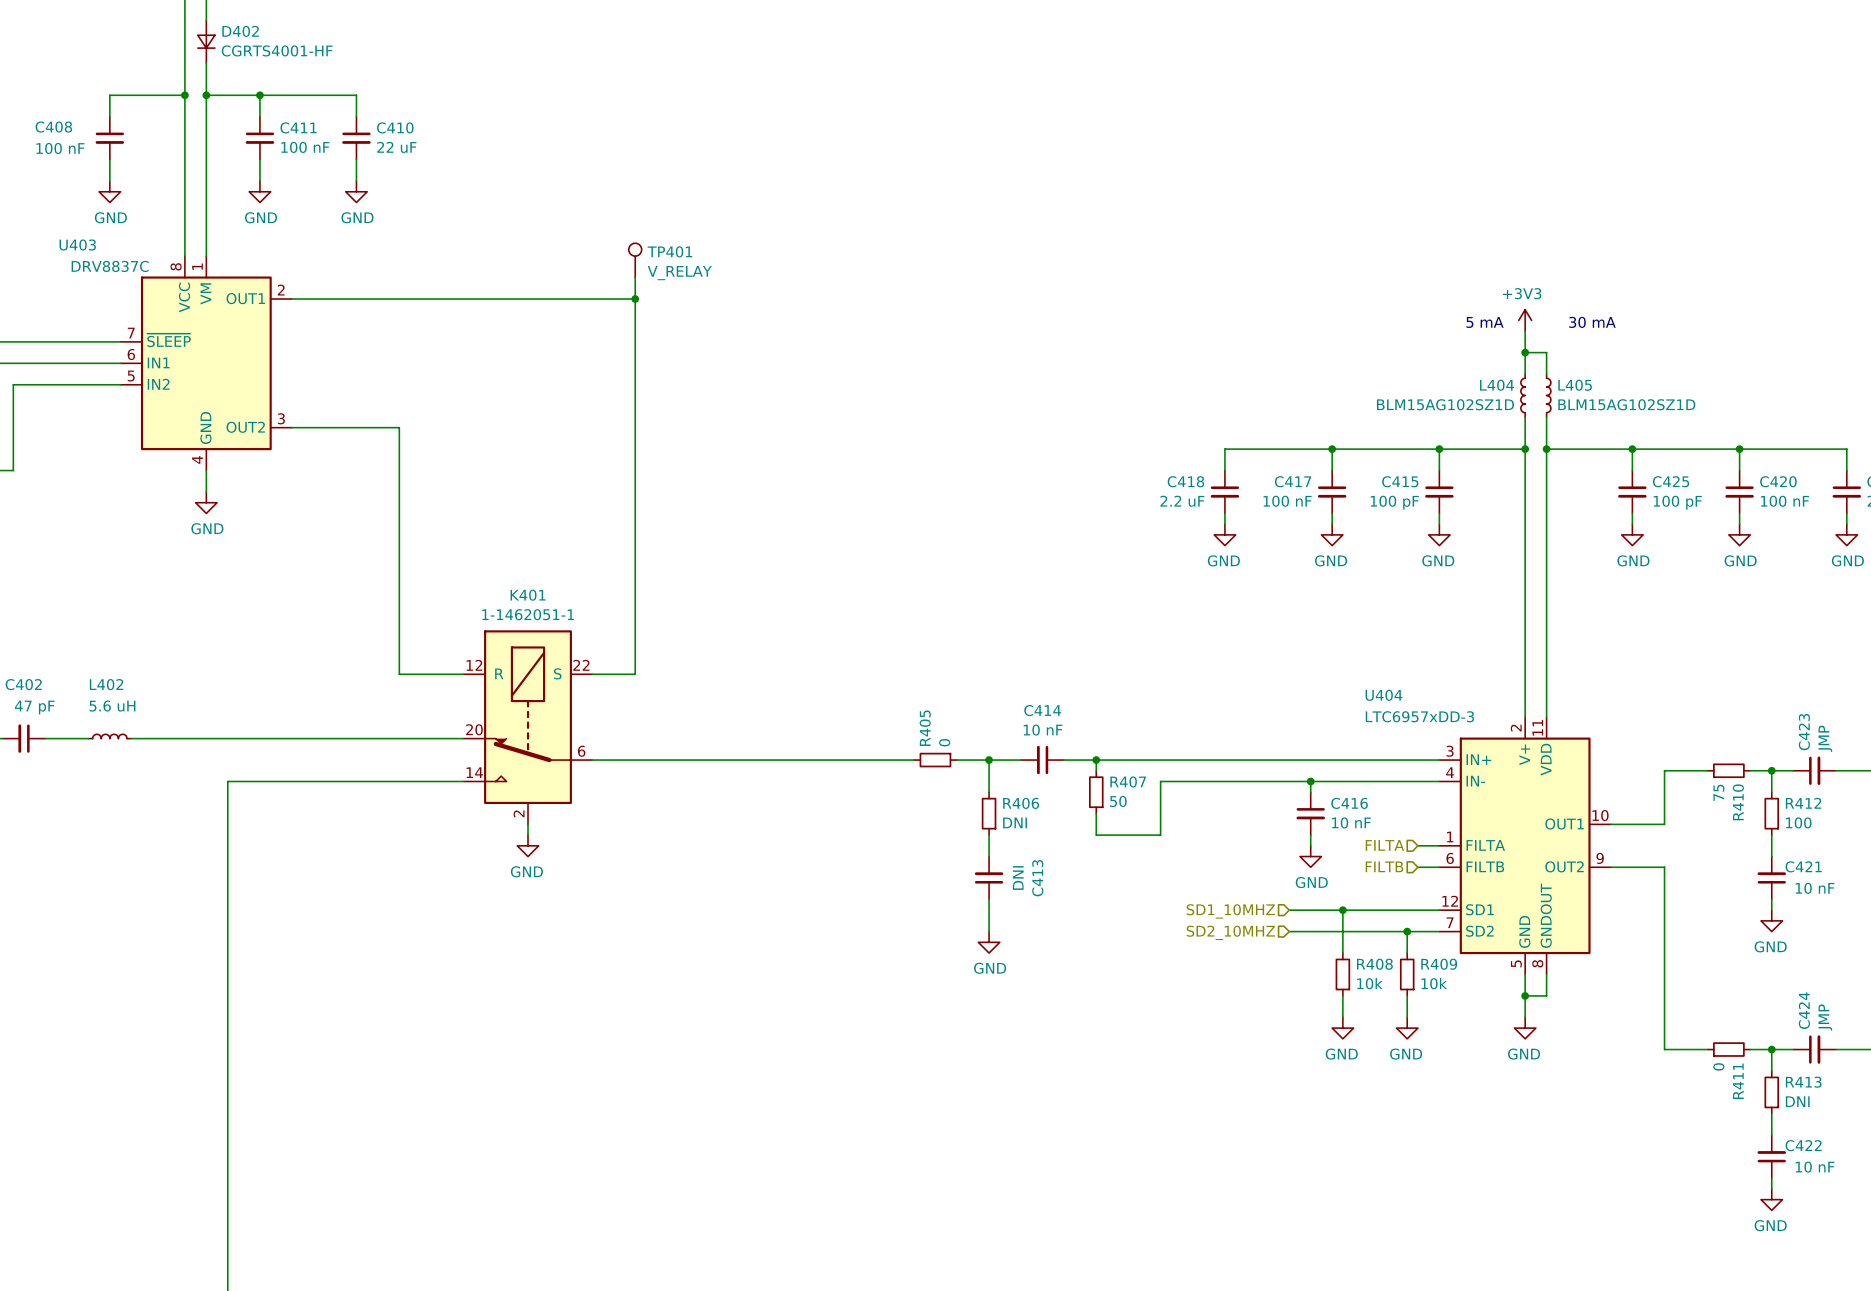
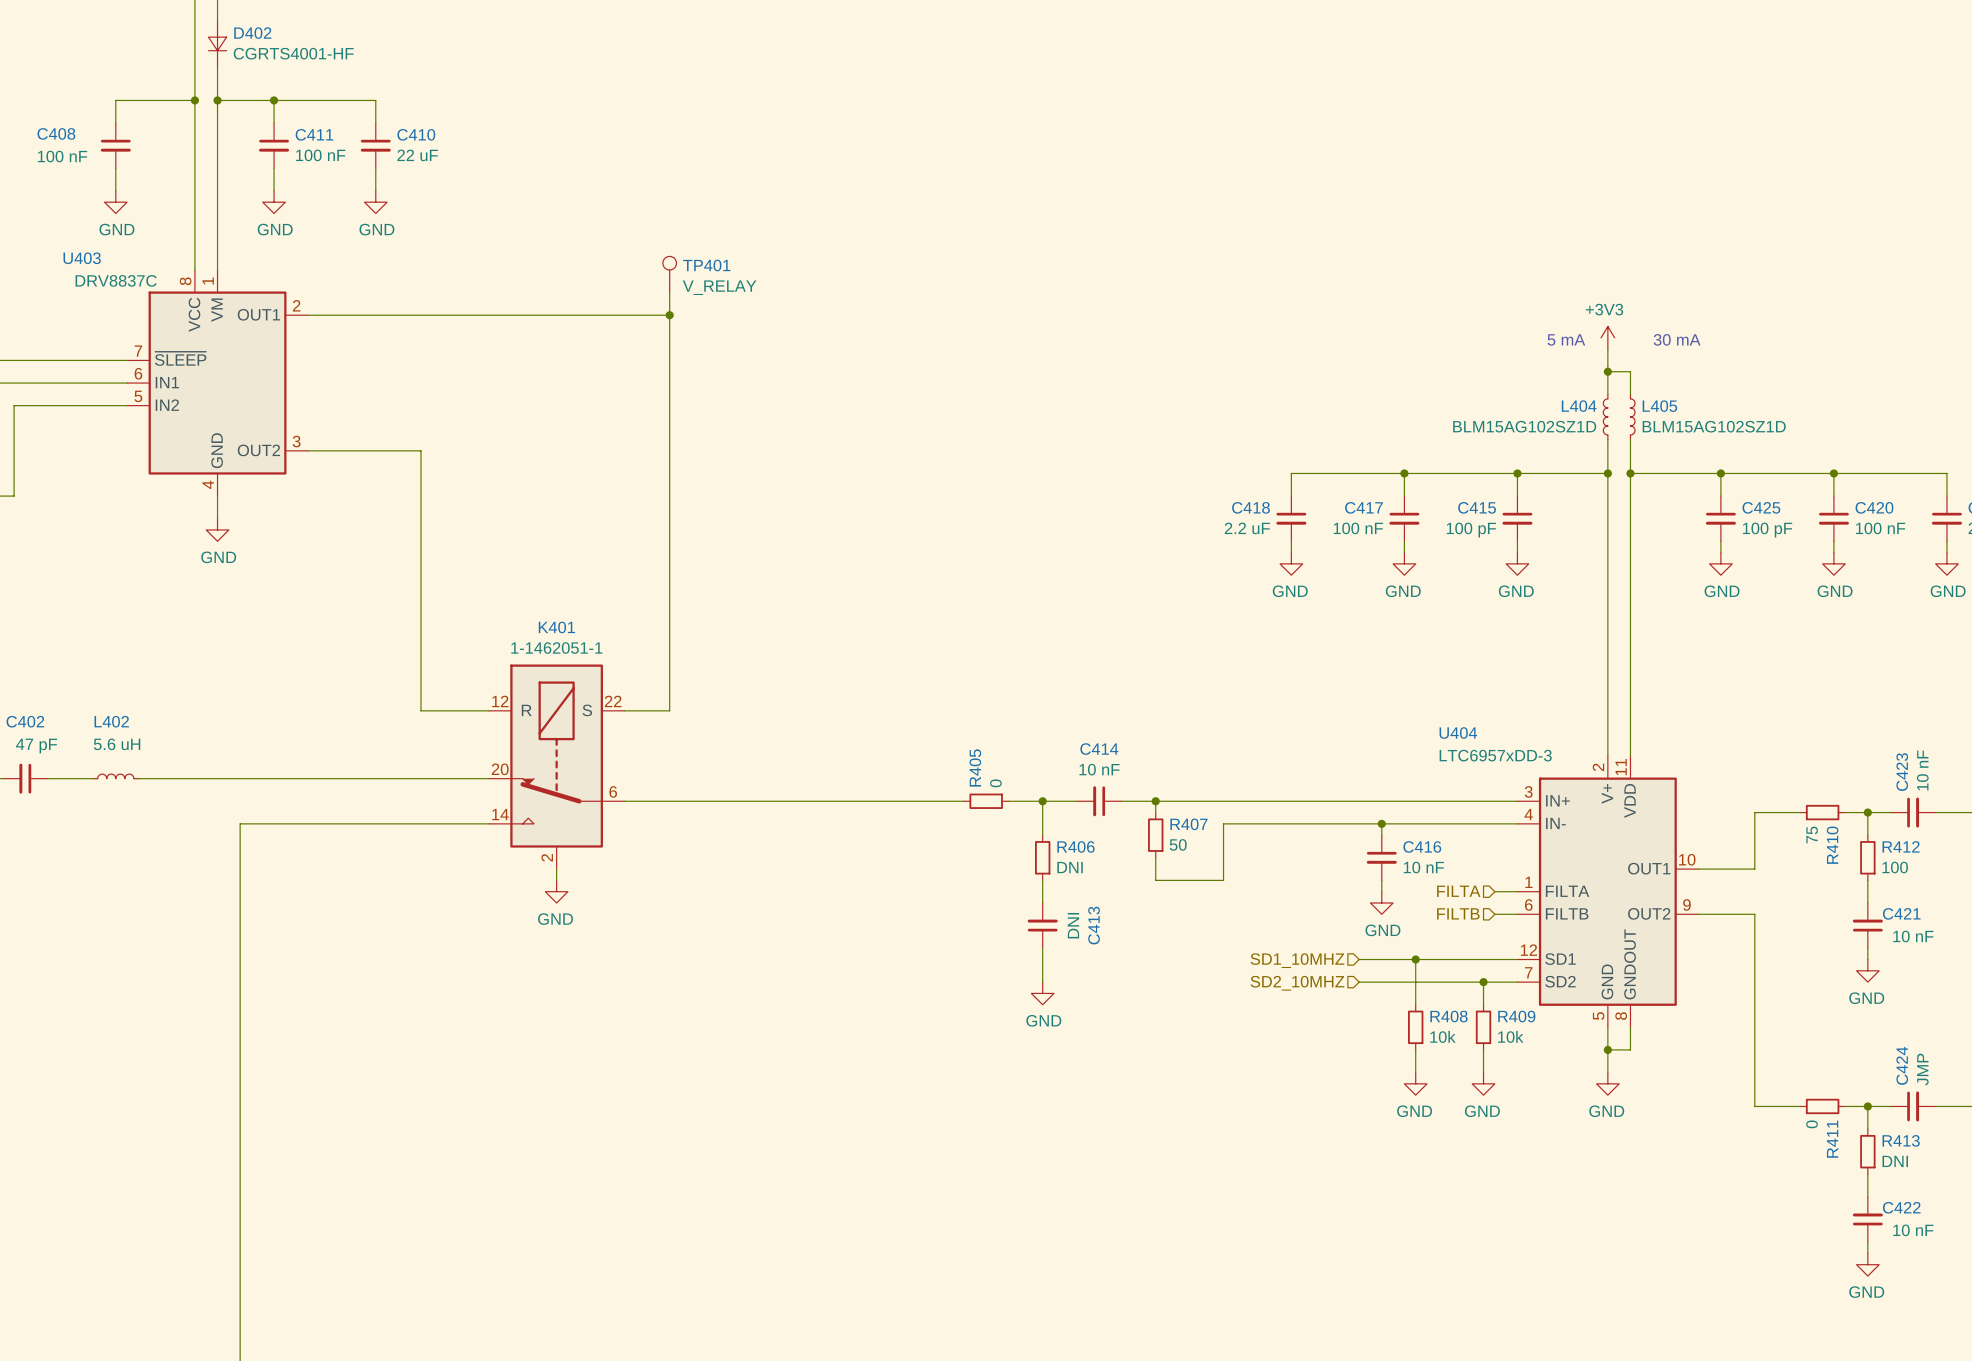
C423 value: JMP (1825, 738) -> 10 nF (1922, 770)

